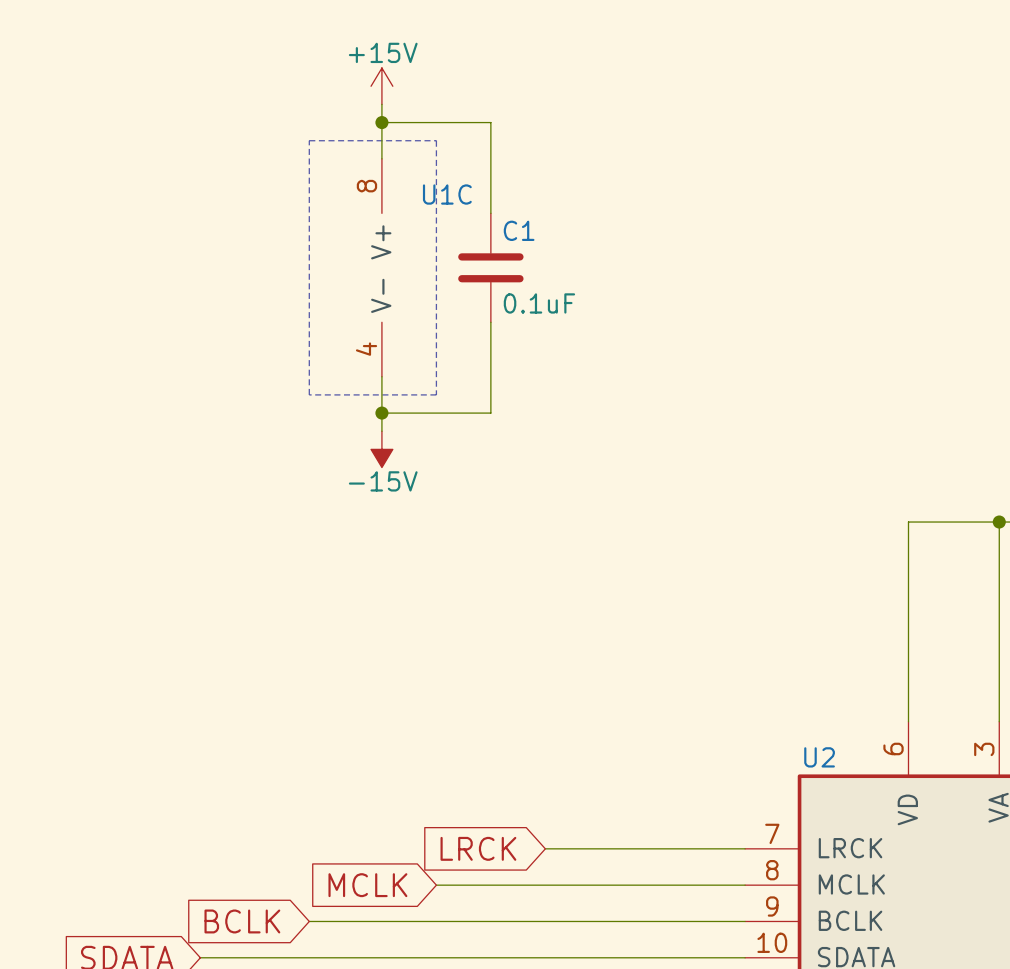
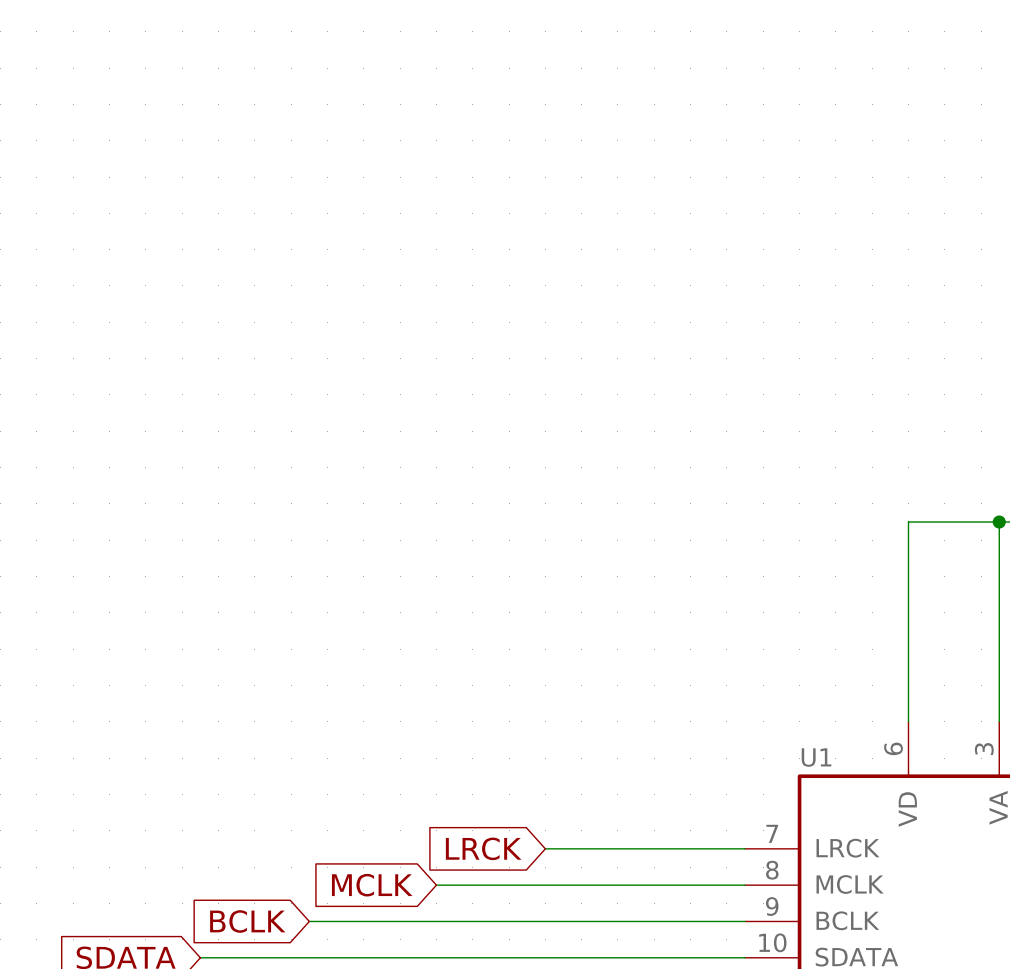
power symbol: +15V (381, 86) -> none
wire: (381, 104) (381, 158) -> none
wire: (381, 122) (490, 122) (490, 213) -> none
junction: (381, 122) -> none
line: (309, 140) (436, 140) (436, 394) (309, 394) (309, 140) -> none
U1C: (381, 267) -> none
C1: 0.1uF (490, 267) -> none
wire: (490, 322) (490, 413) (381, 413) -> none
wire: (381, 376) (381, 431) -> none
junction: (381, 413) -> none
power symbol: -15V (381, 449) -> none
U2 name: U2 (819, 757) -> U1 (816, 757)

